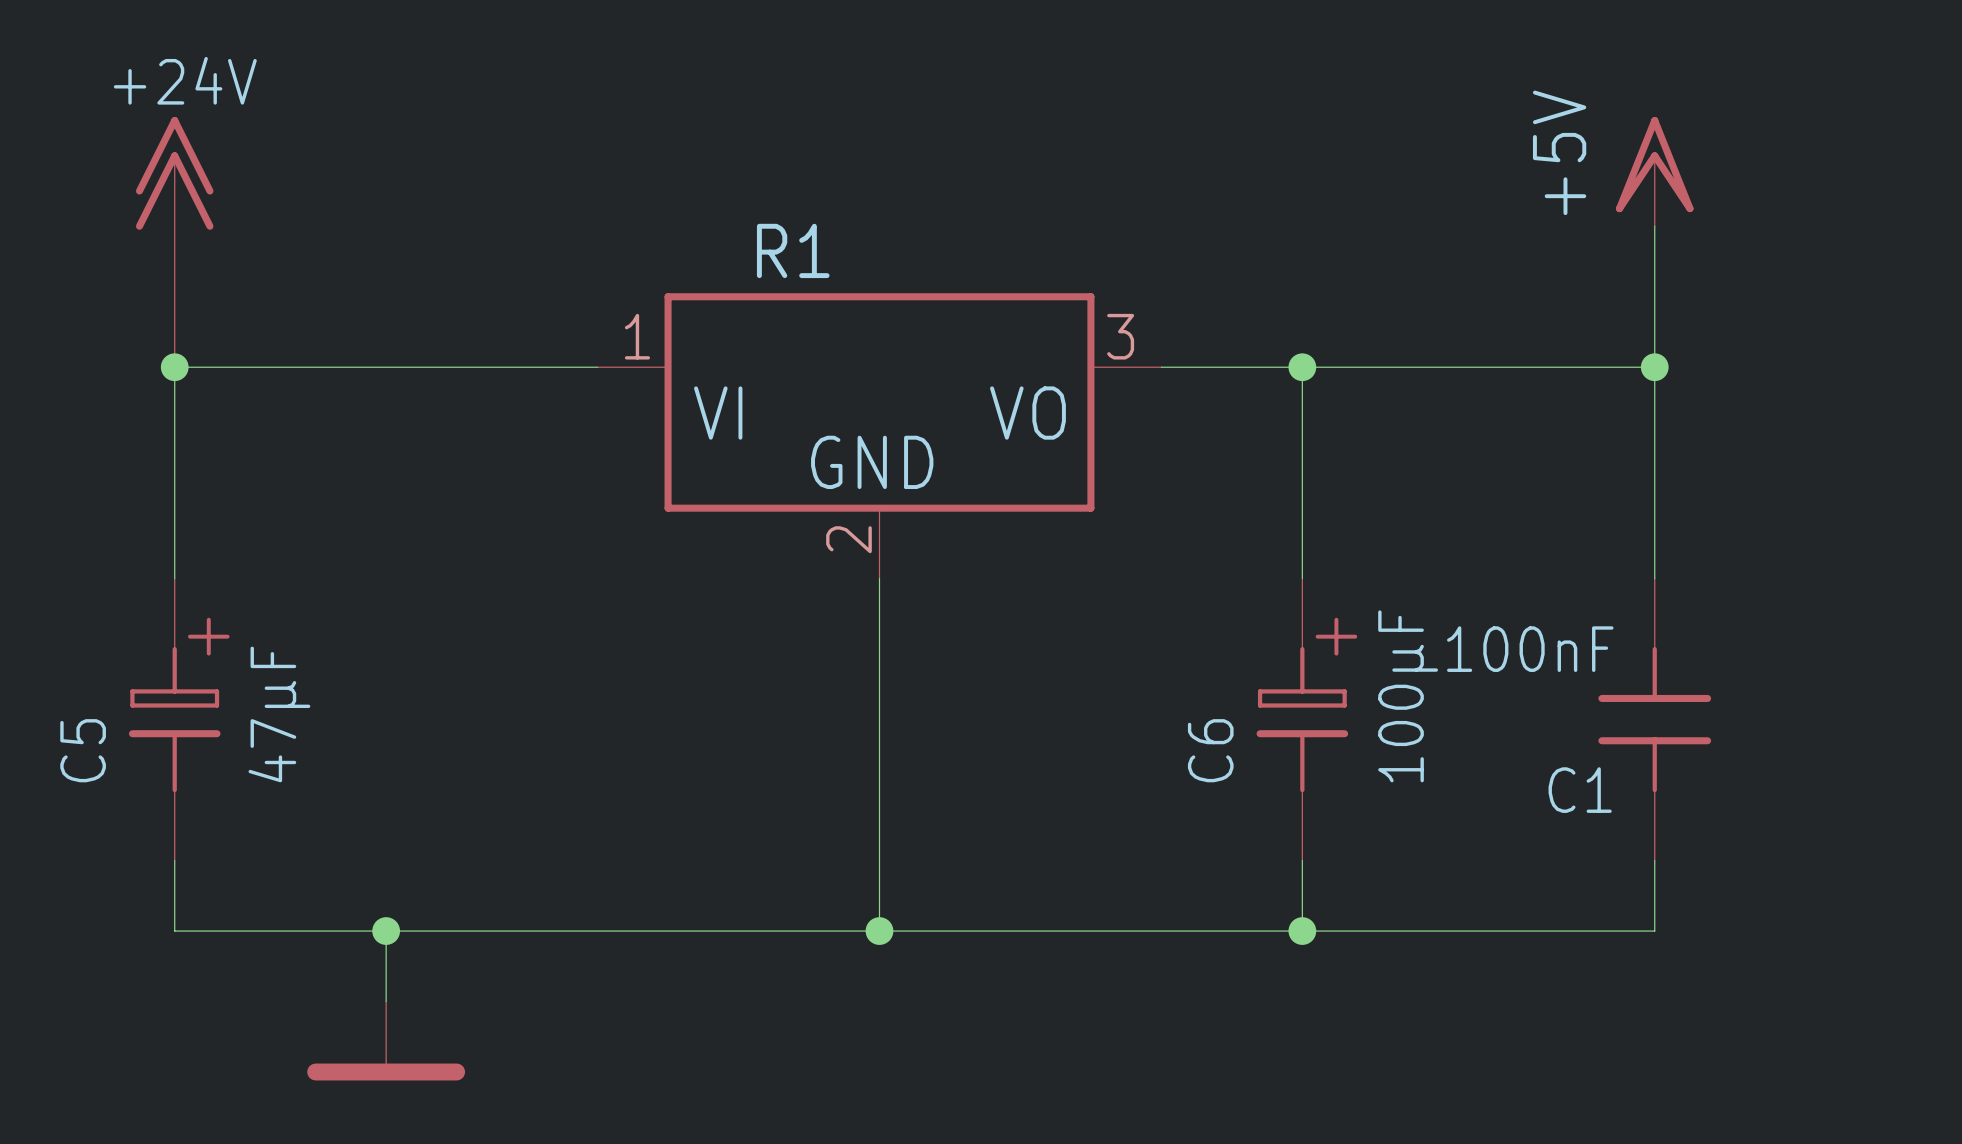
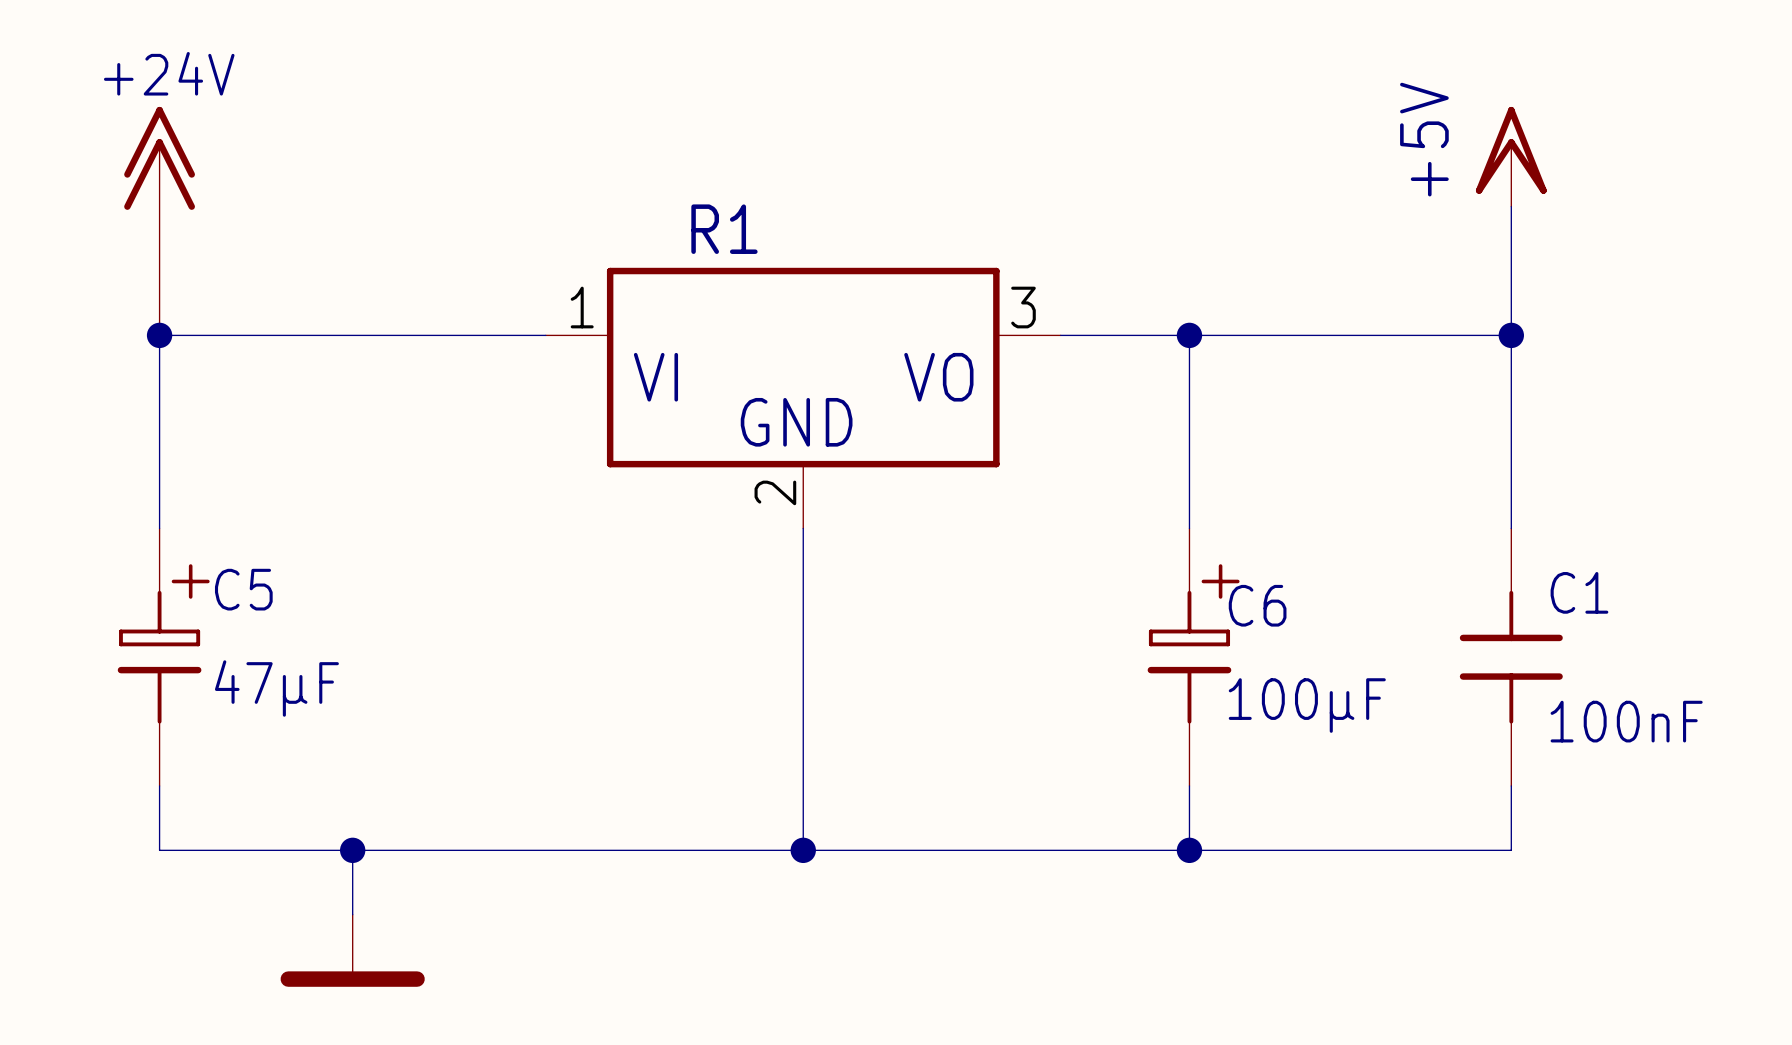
C1 value position: 100nF (1530, 649) -> 100nF (1626, 721)
C6 value rotation: 0° (1408, 696) -> 90° clockwise (1307, 705)
C5 value rotation: 0° (279, 714) -> 90° clockwise (276, 688)
C5 name rotation: 0° (83, 750) -> 90° clockwise (243, 589)
C5 name position: C5 (83, 750) -> C5 (243, 589)
C6 name rotation: 0° (1210, 750) -> 90° clockwise (1257, 605)
C6 name position: C6 (1210, 750) -> C6 (1257, 605)
C1 name position: C1 (1580, 790) -> C1 (1579, 592)

